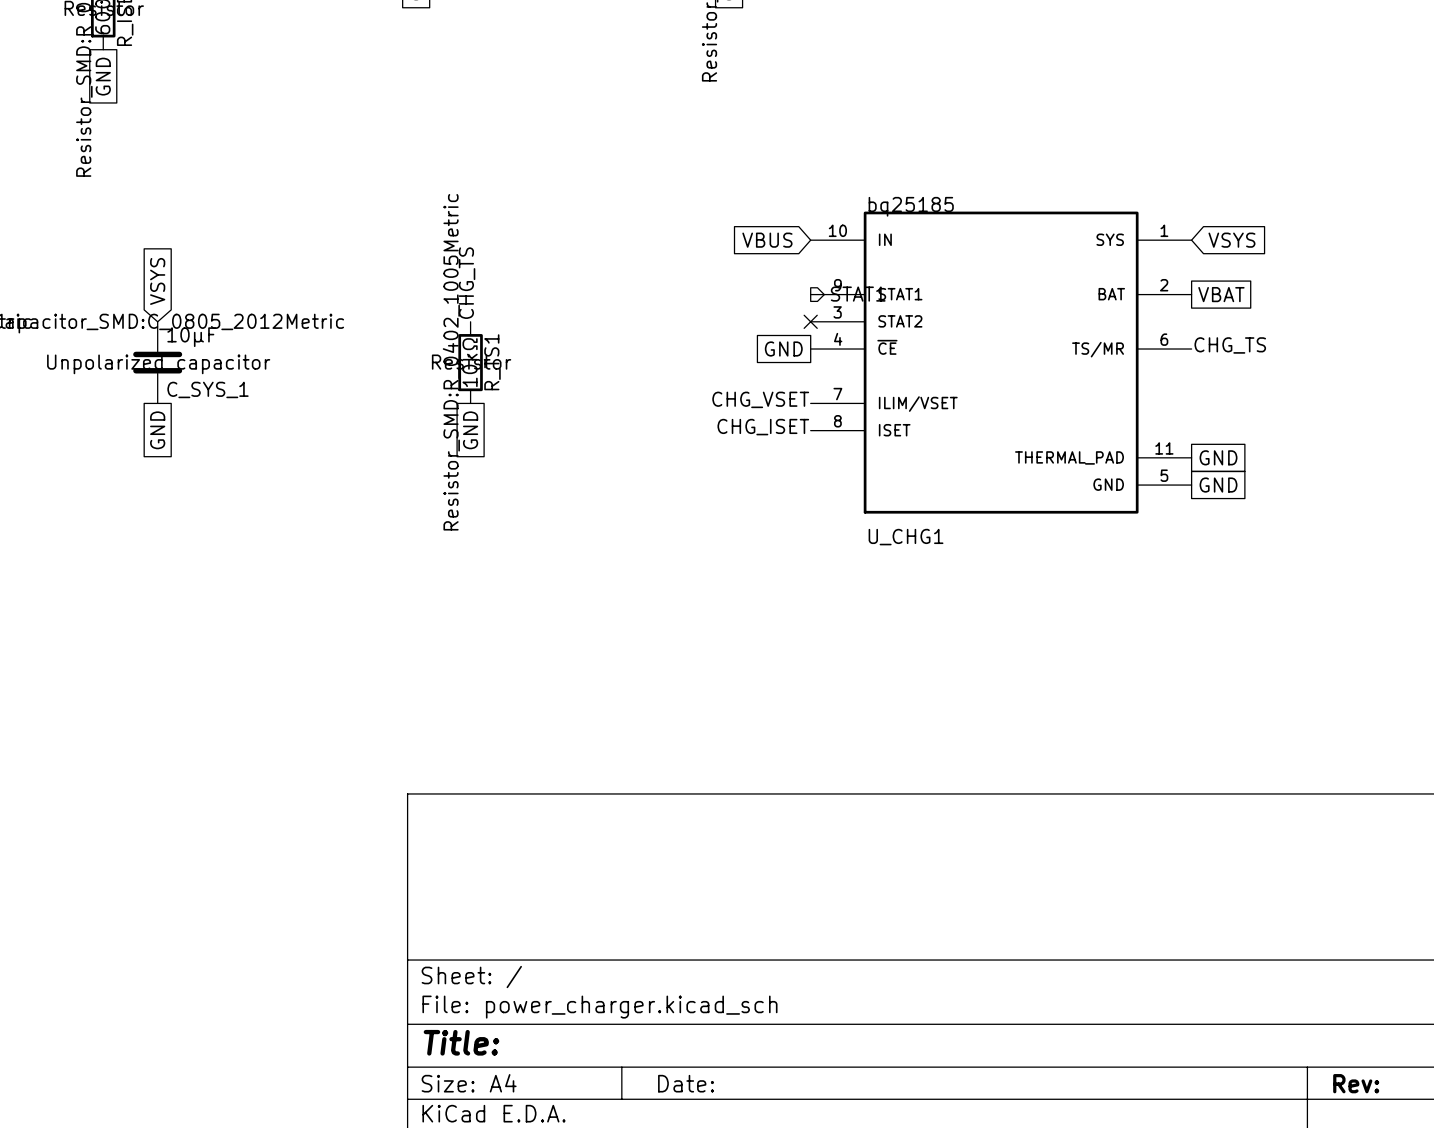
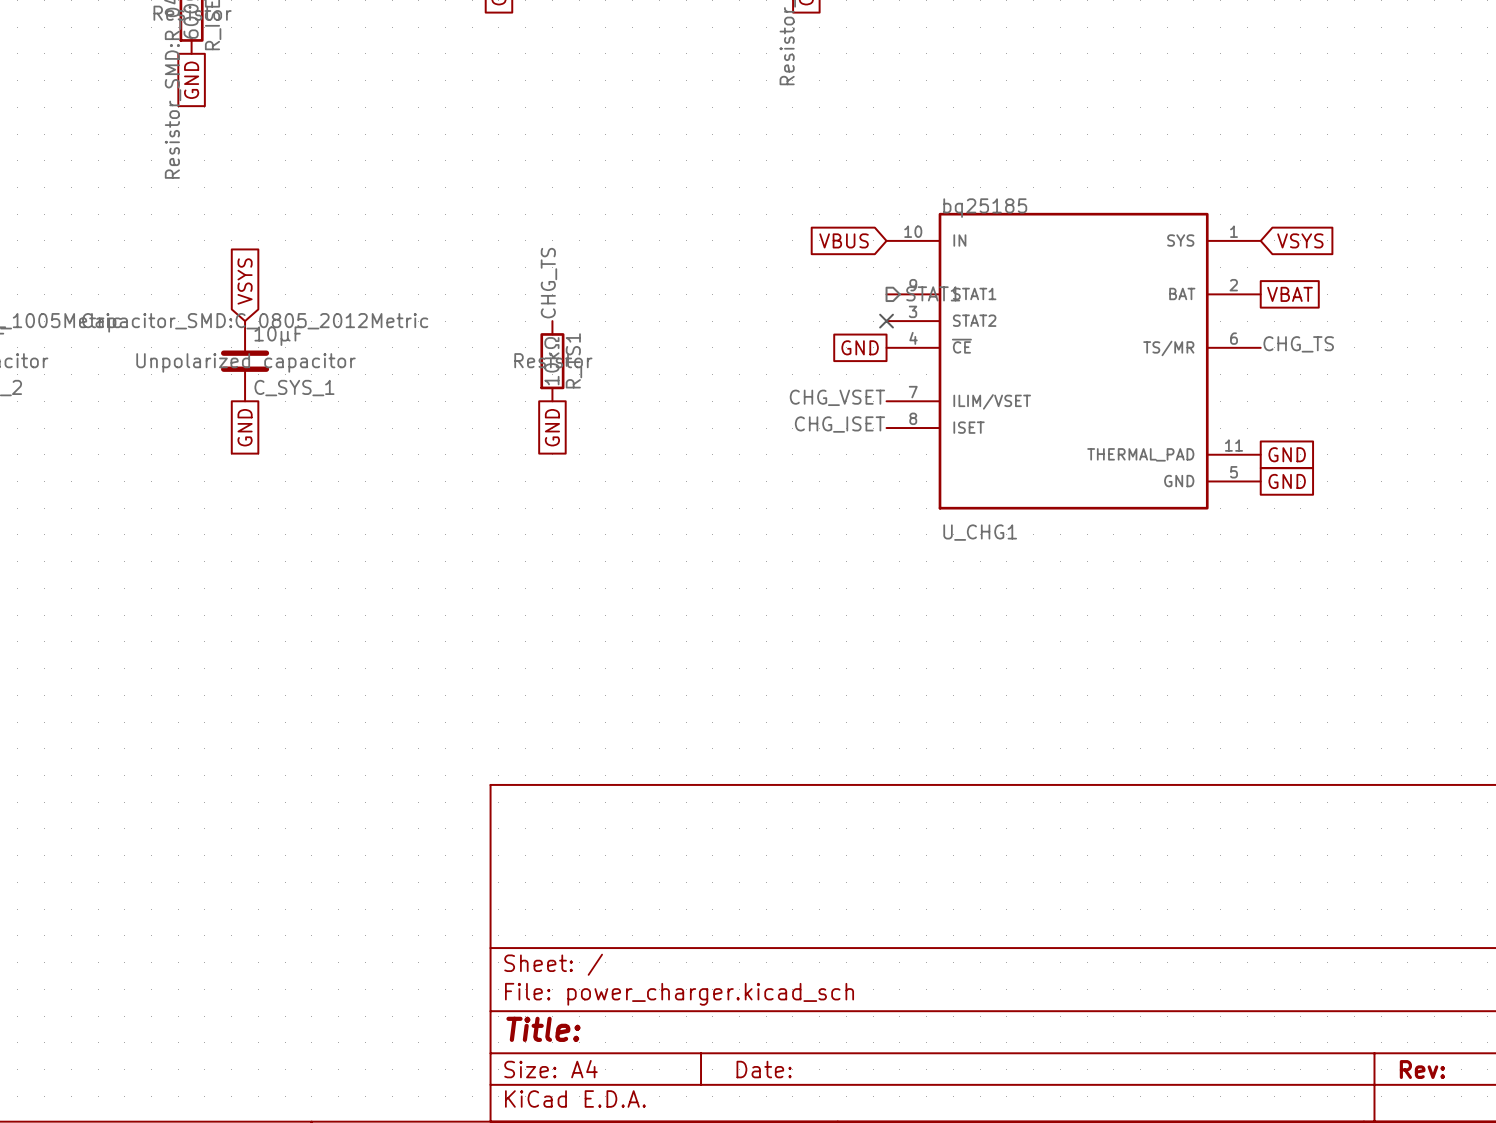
R_TS1 text: Resistor_SMD:R_0402_1005Metric (451, 362) -> none

